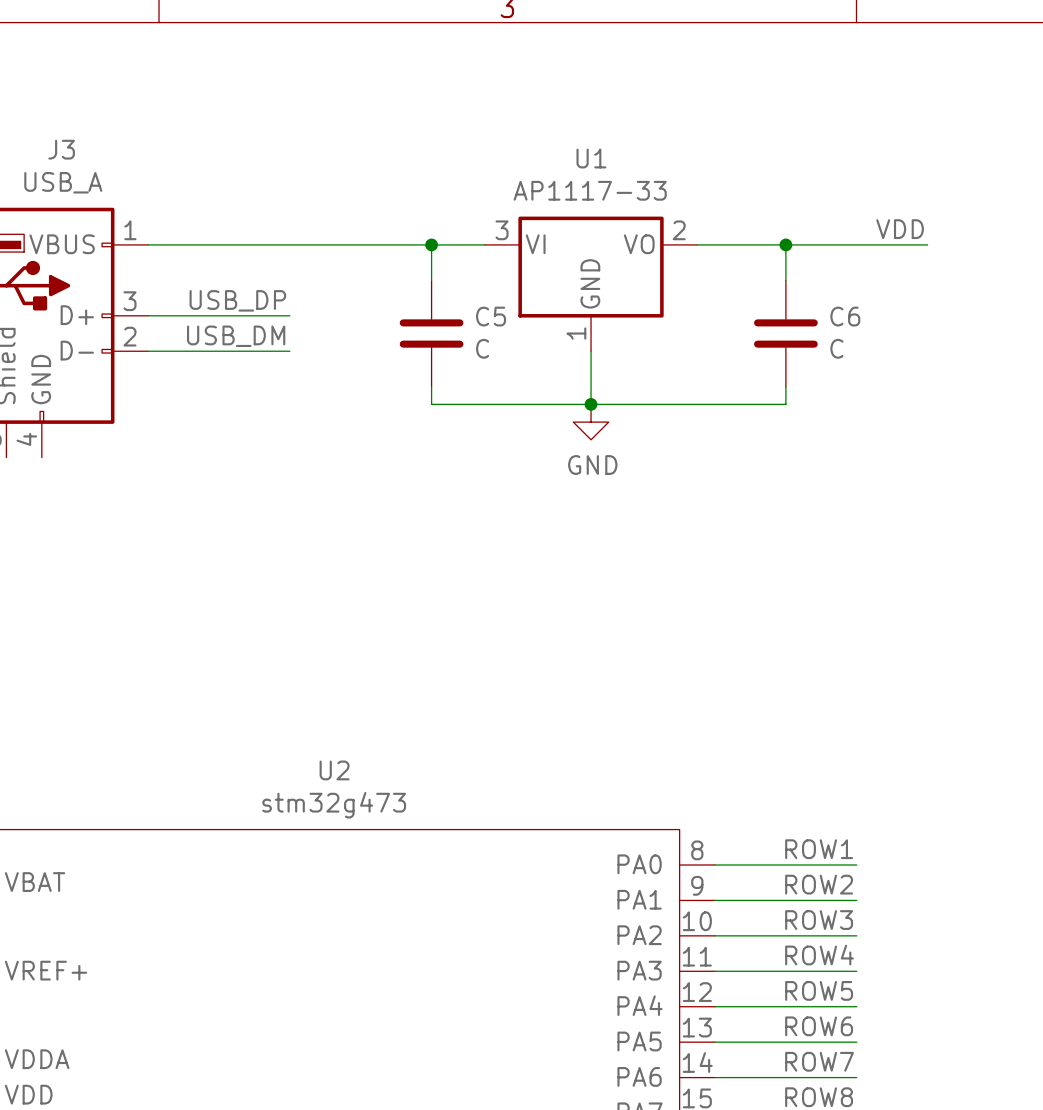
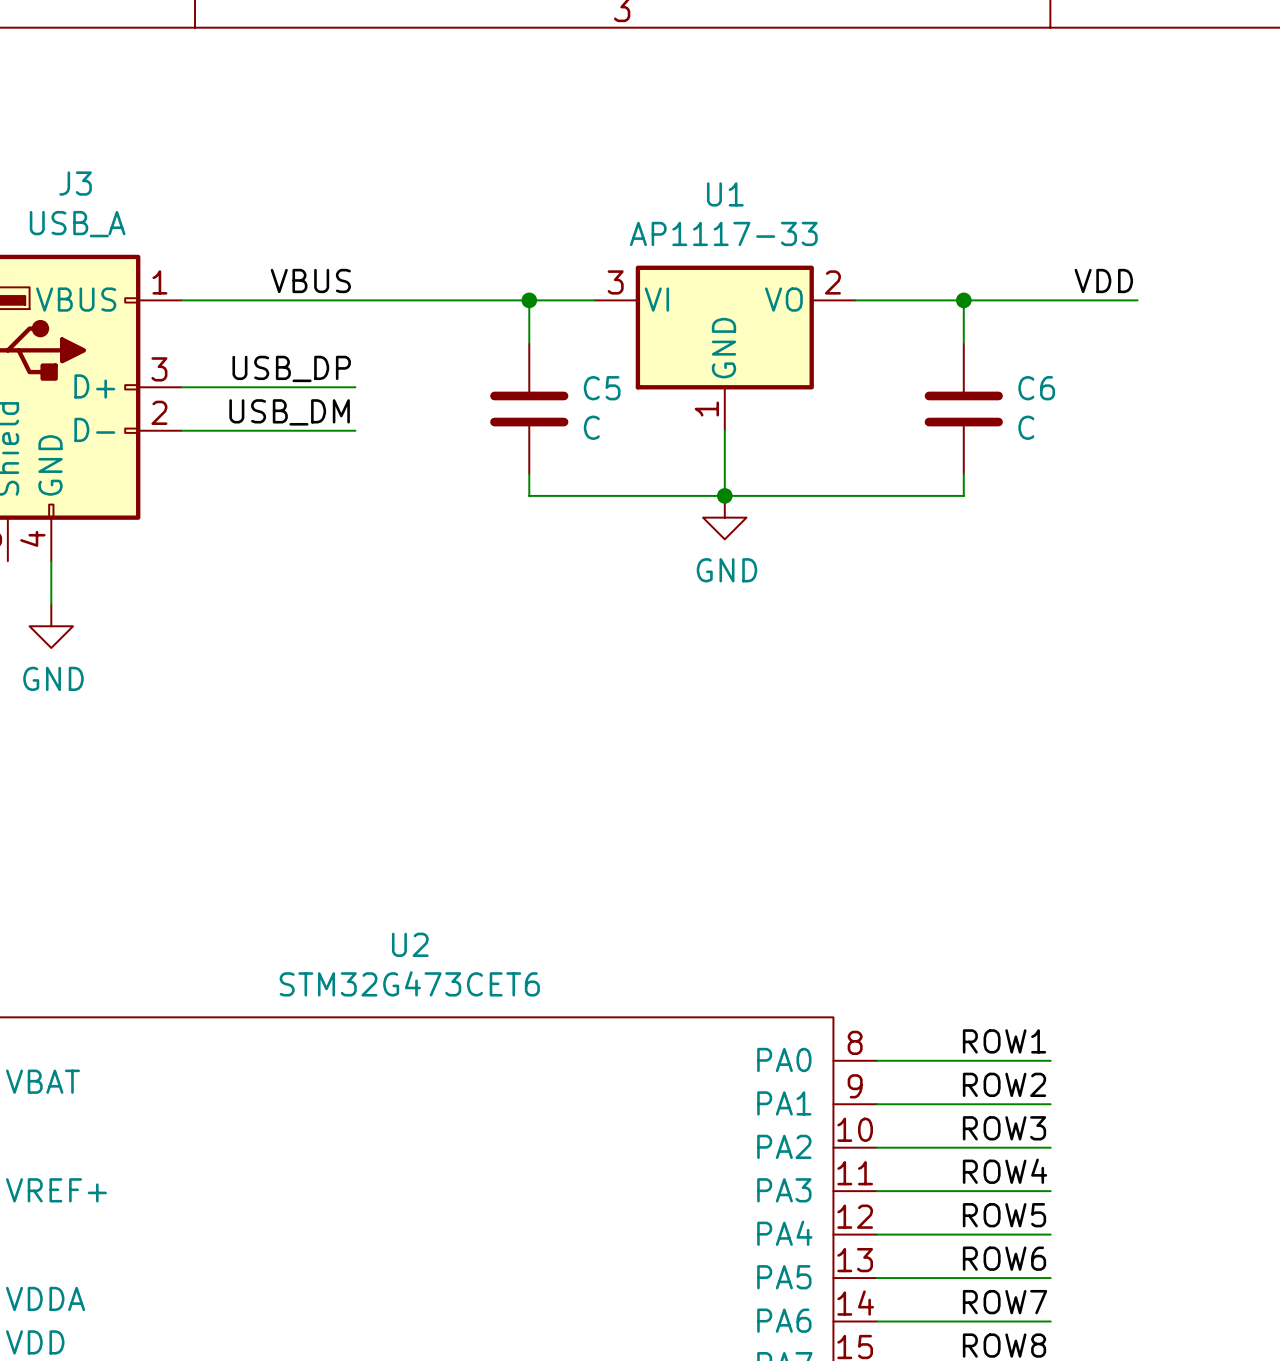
label: none -> VBUS (310, 280)
wire: none -> (51, 561) (51, 604)
power symbol: none -> GND (51, 626)
U2 value: stm32g473 (334, 805) -> STM32G473CET6 (409, 983)

